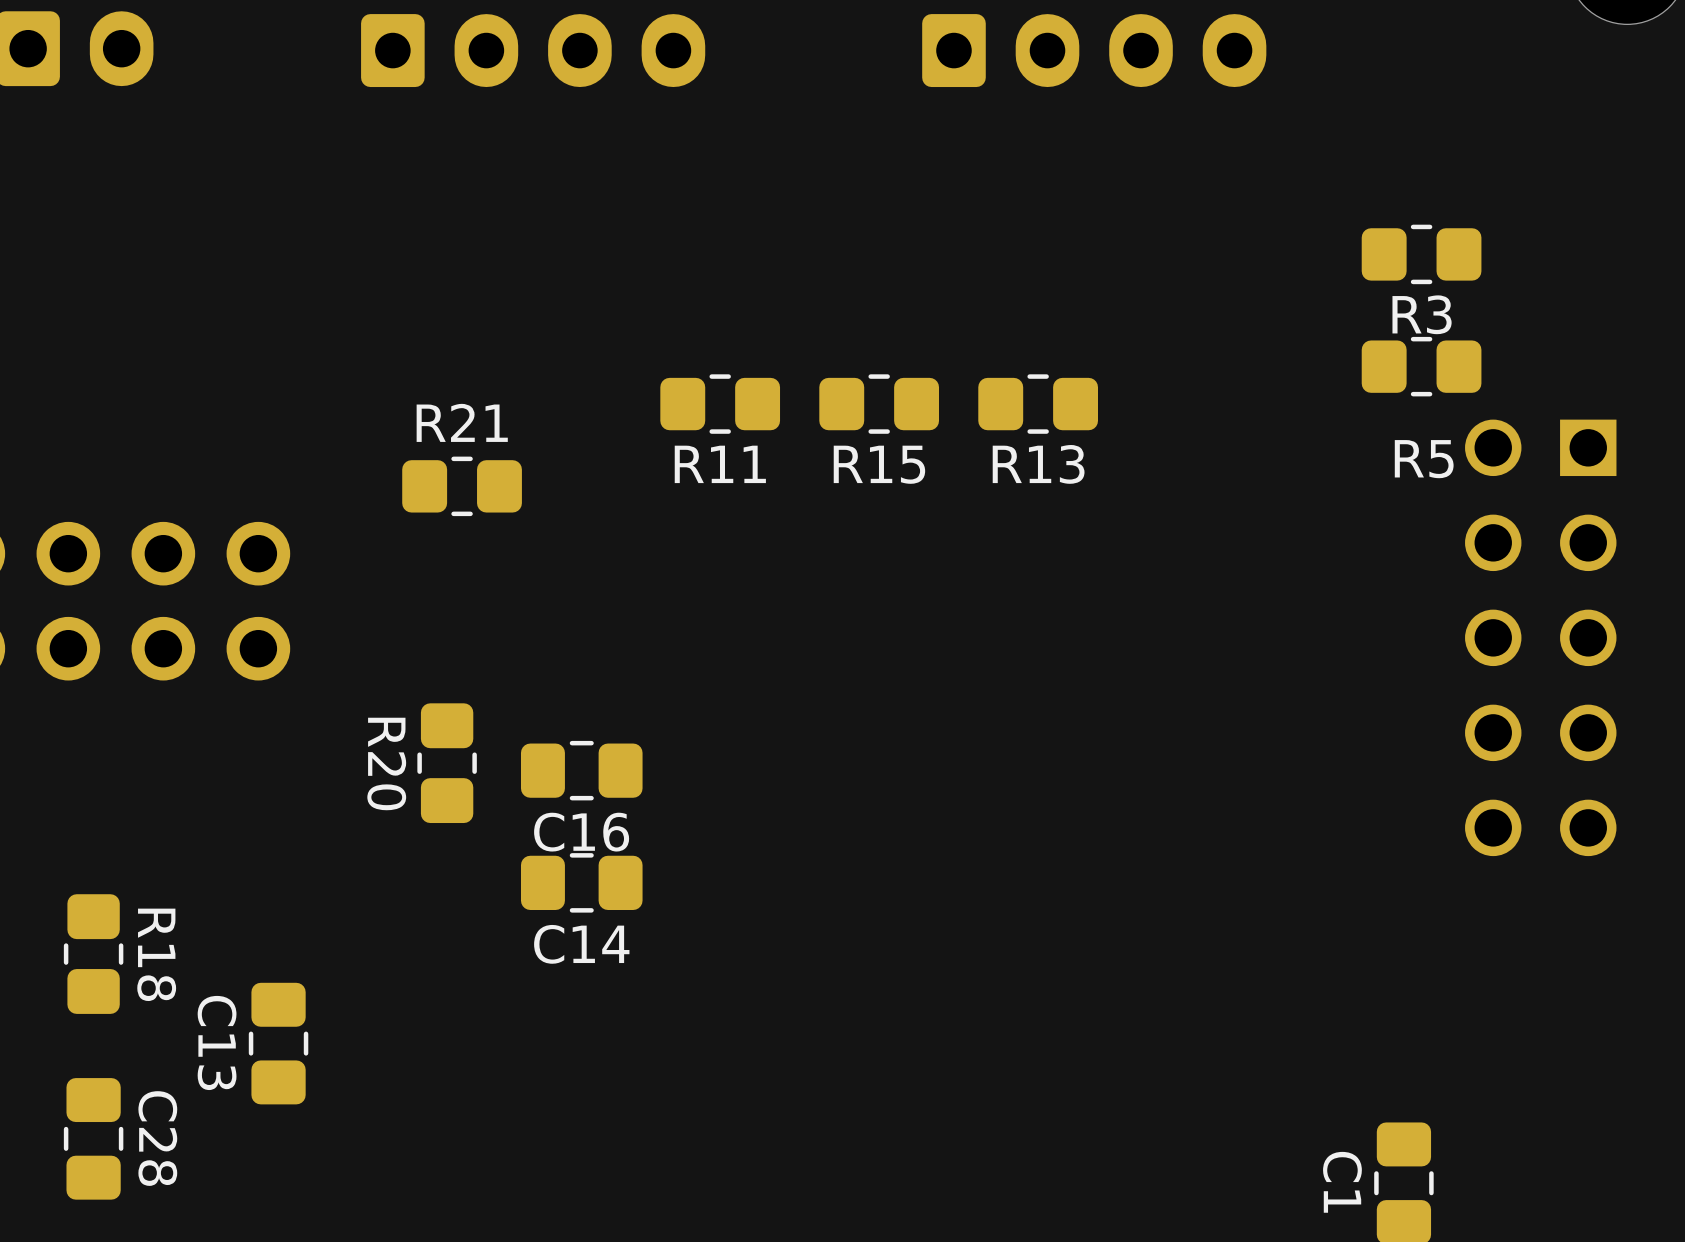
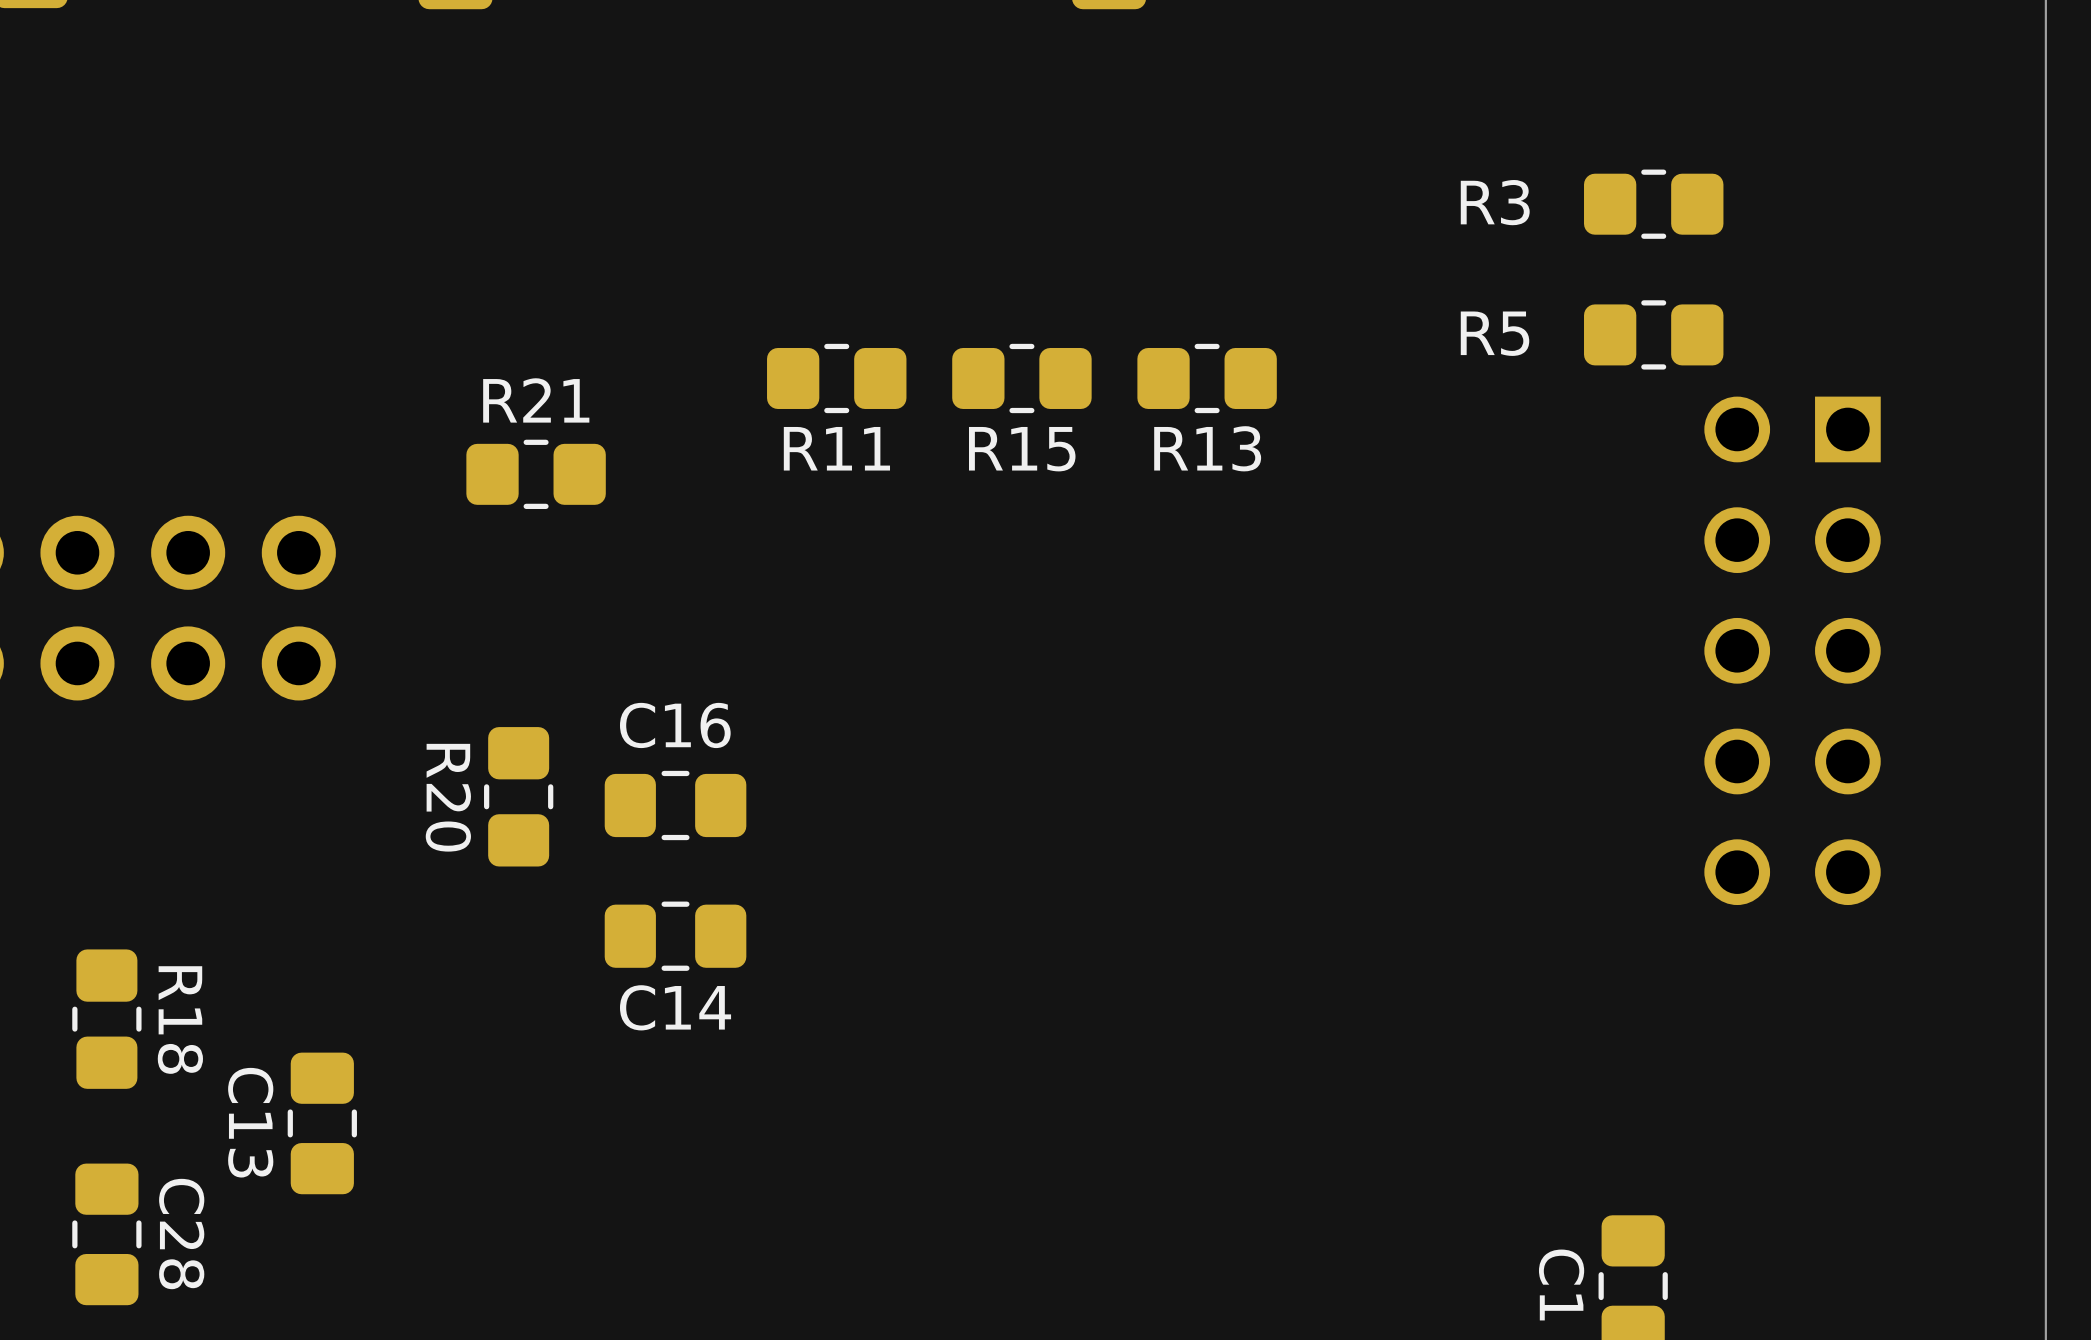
R3 name position: R3 (1422, 314) -> R3 (1495, 202)
R5 name position: R5 (1424, 459) -> R5 (1495, 333)
C16 name position: C16 (581, 832) -> C16 (675, 725)

